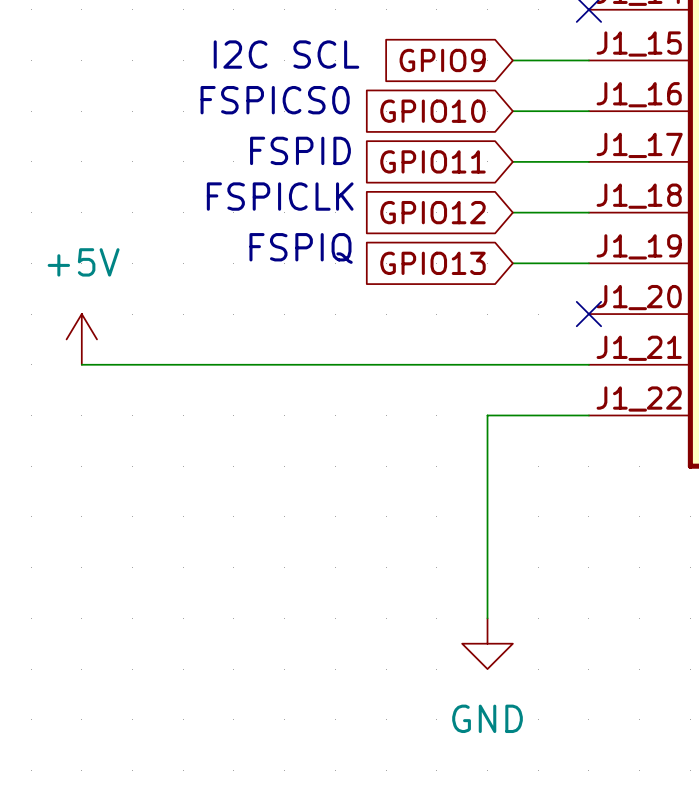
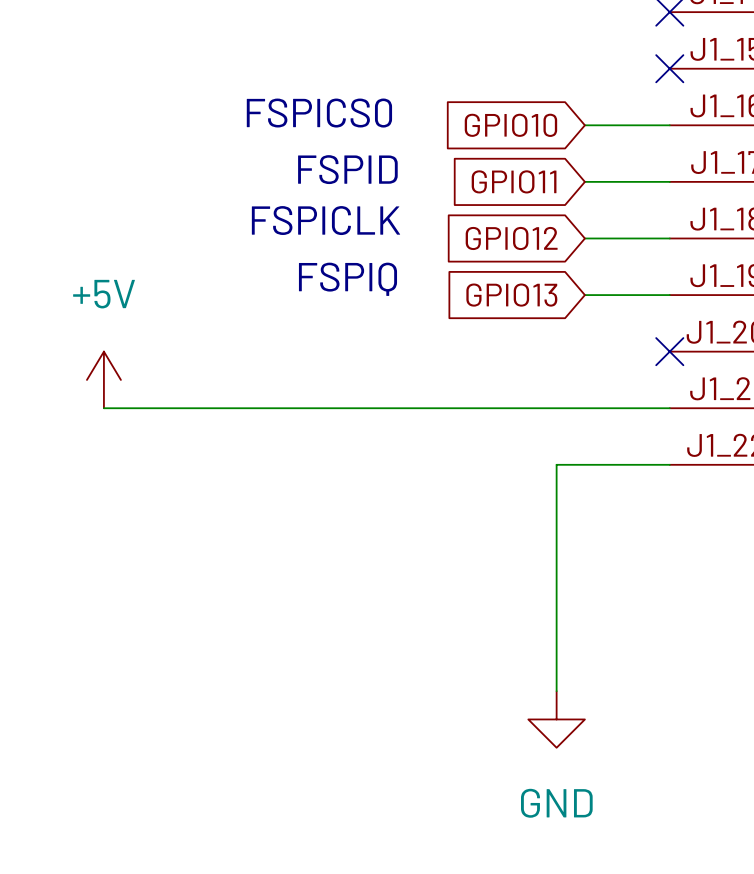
text: I2C SCL (286, 54) -> none
global label: GPIO9 (442, 60) -> none
wire: (512, 60) (588, 60) -> none
no-connect mark: none -> (669, 68)

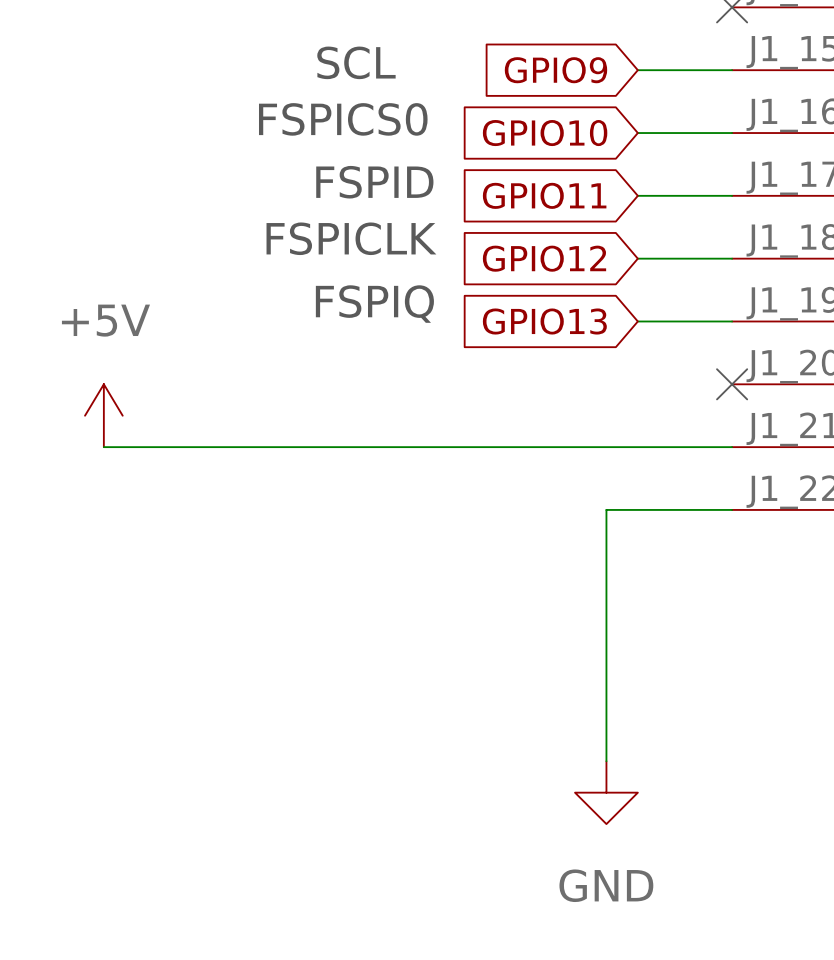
text: none -> SCL (356, 62)
global label: none -> GPIO9 (555, 70)
wire: none -> (637, 70) (732, 70)
no-connect mark: (669, 68) -> none

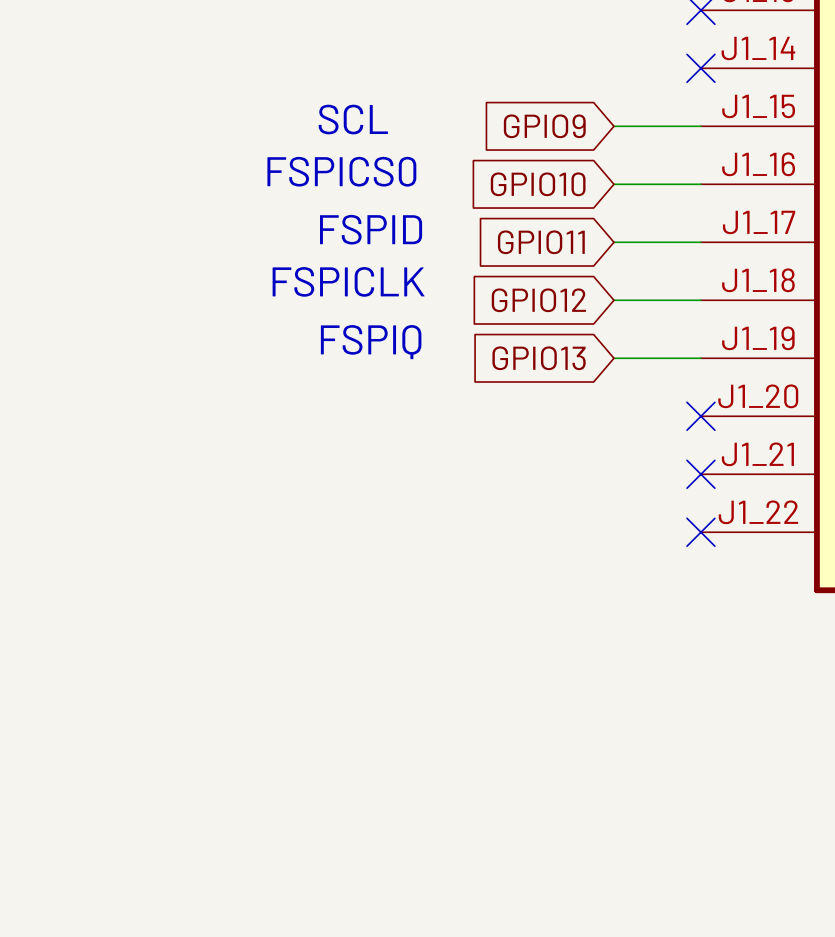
power symbol: +5V (103, 415) -> none
wire: (103, 447) (732, 447) -> none
no-connect mark: none -> (700, 474)
wire: (732, 509) (606, 509) (606, 761) -> none
no-connect mark: none -> (700, 532)
power symbol: GND (606, 792) -> none

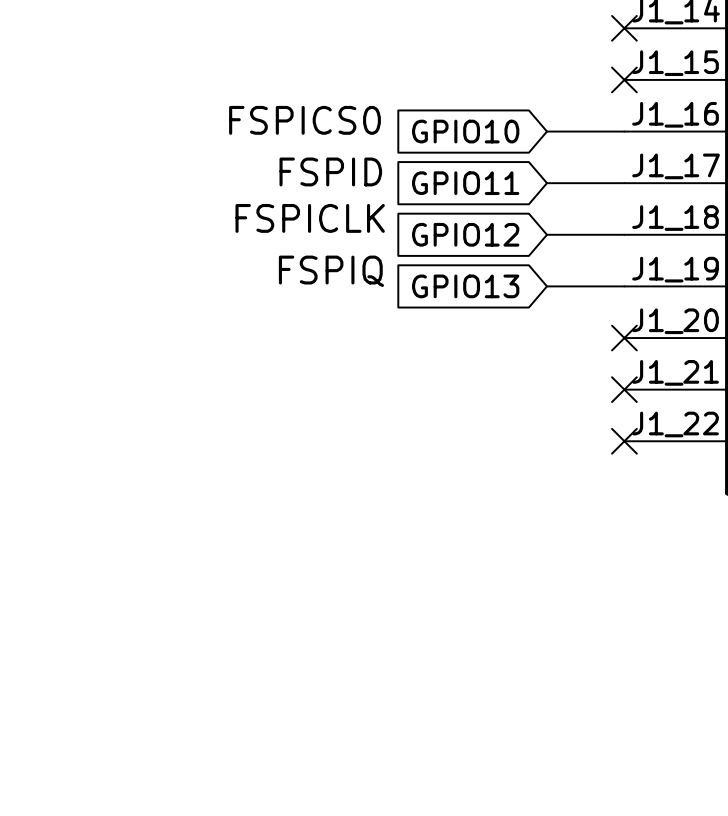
text: SCL (353, 119) -> none
global label: GPIO9 (544, 126) -> none
wire: (613, 126) (700, 126) -> none
no-connect mark: none -> (624, 79)

